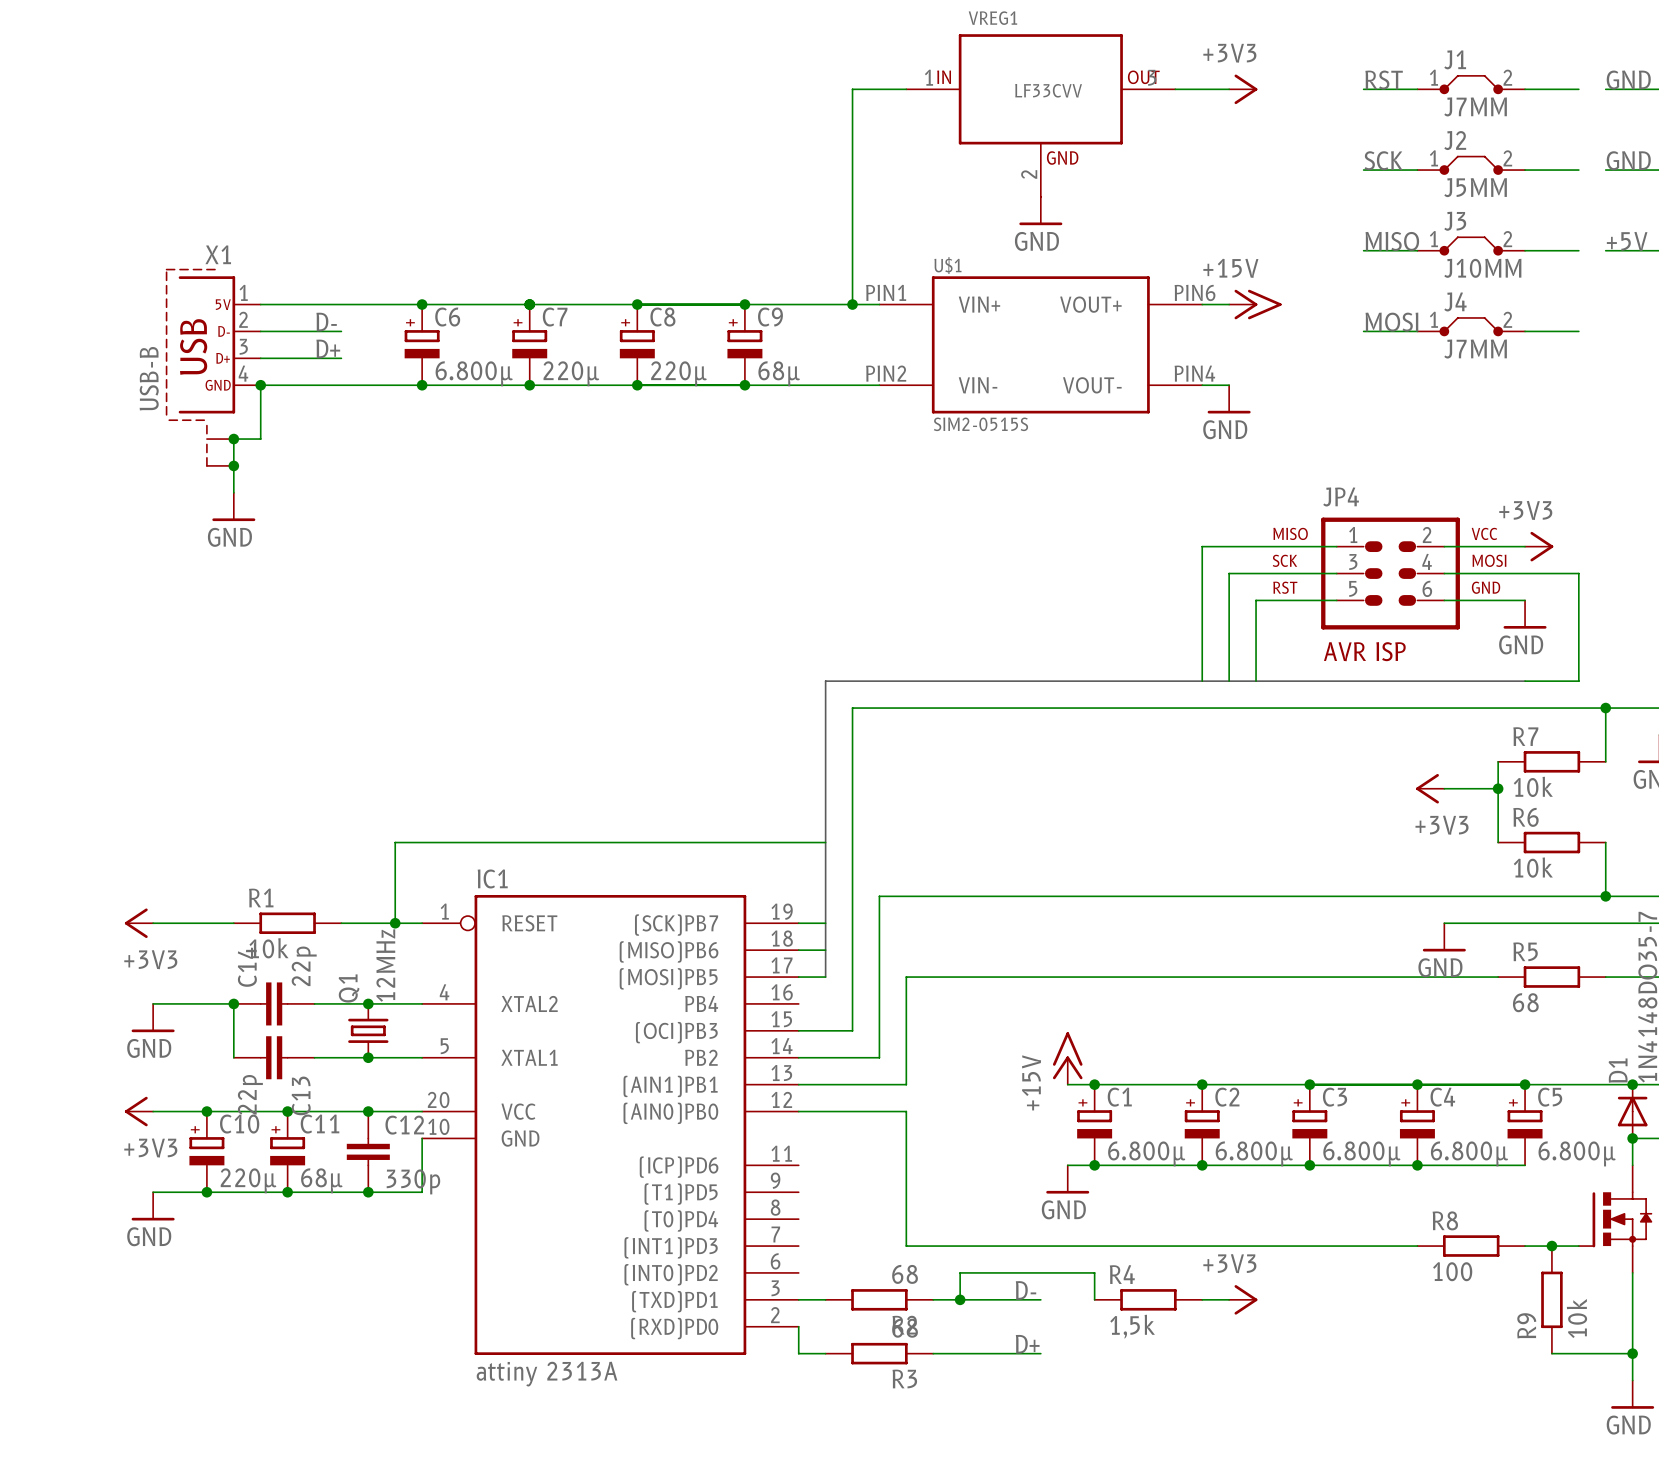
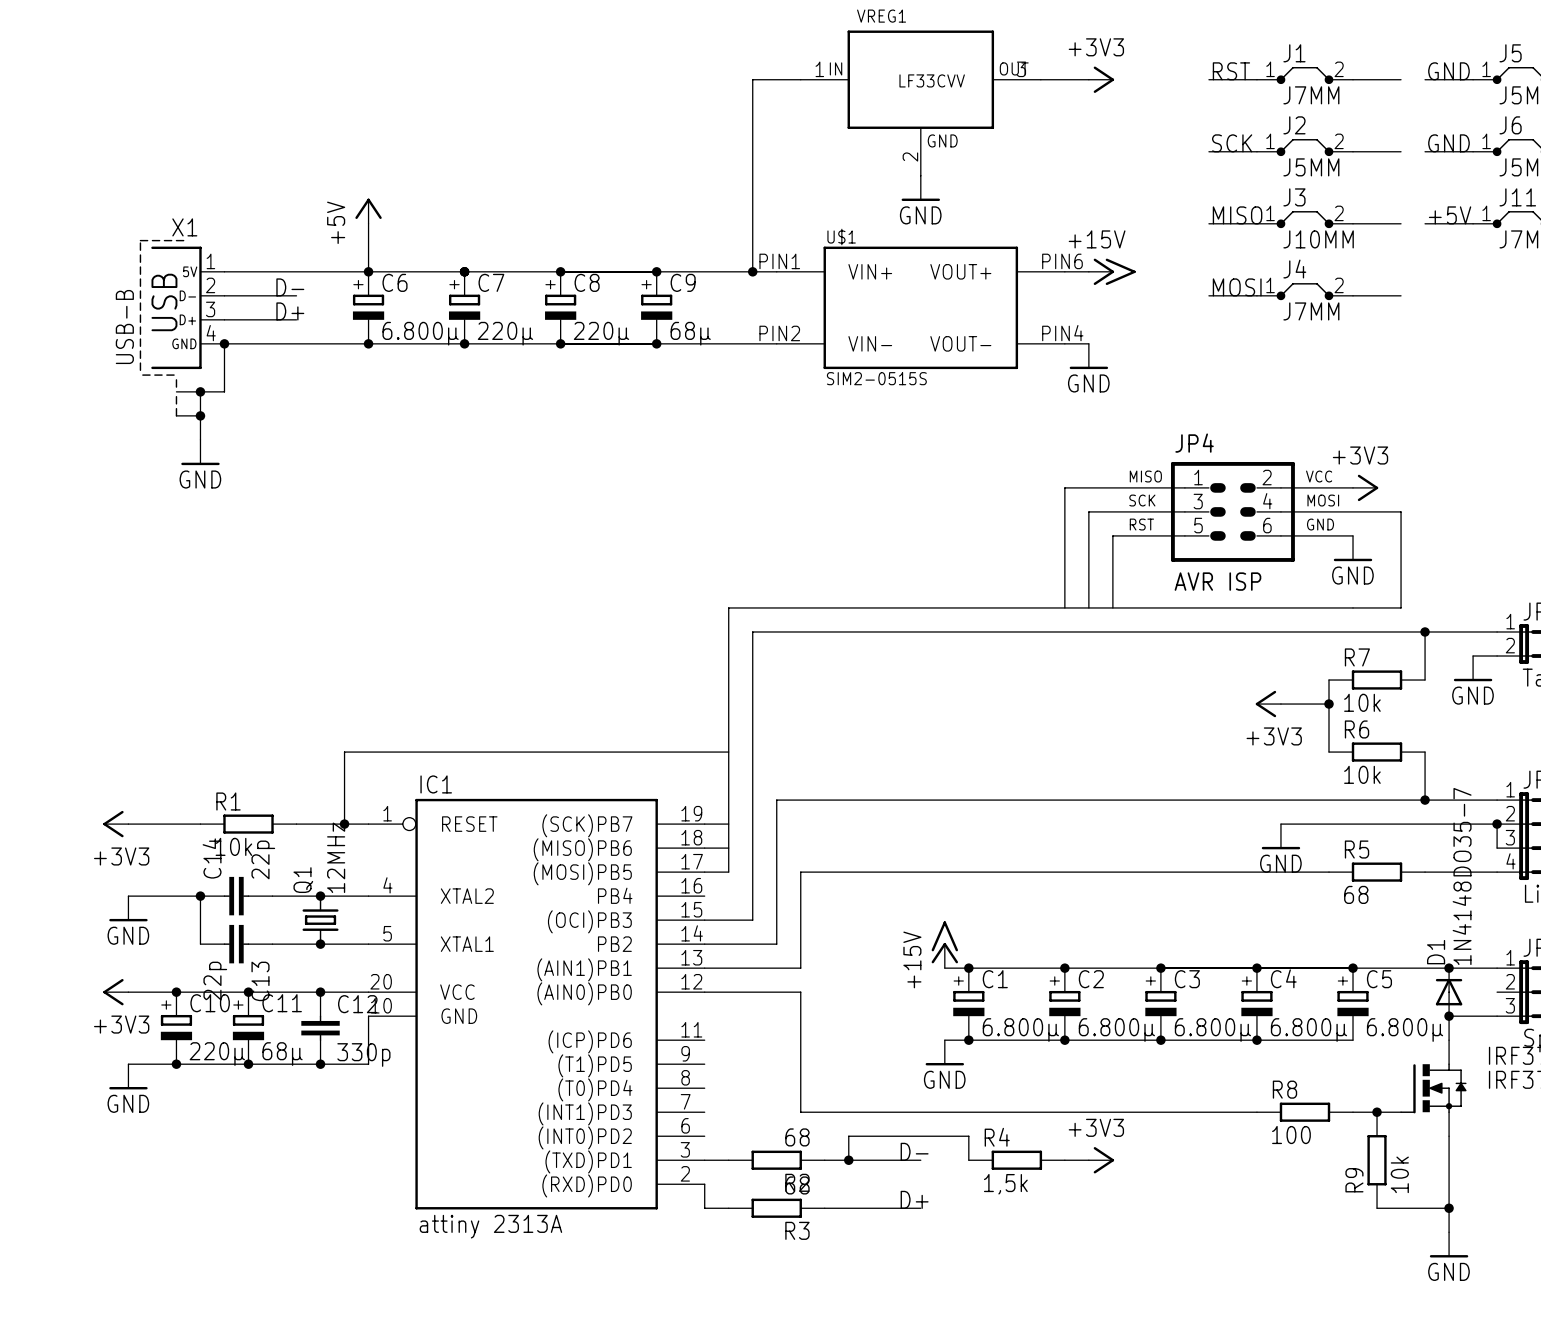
power symbol: none -> +5V (368, 211)
wire: none -> (368, 223) (368, 271)

